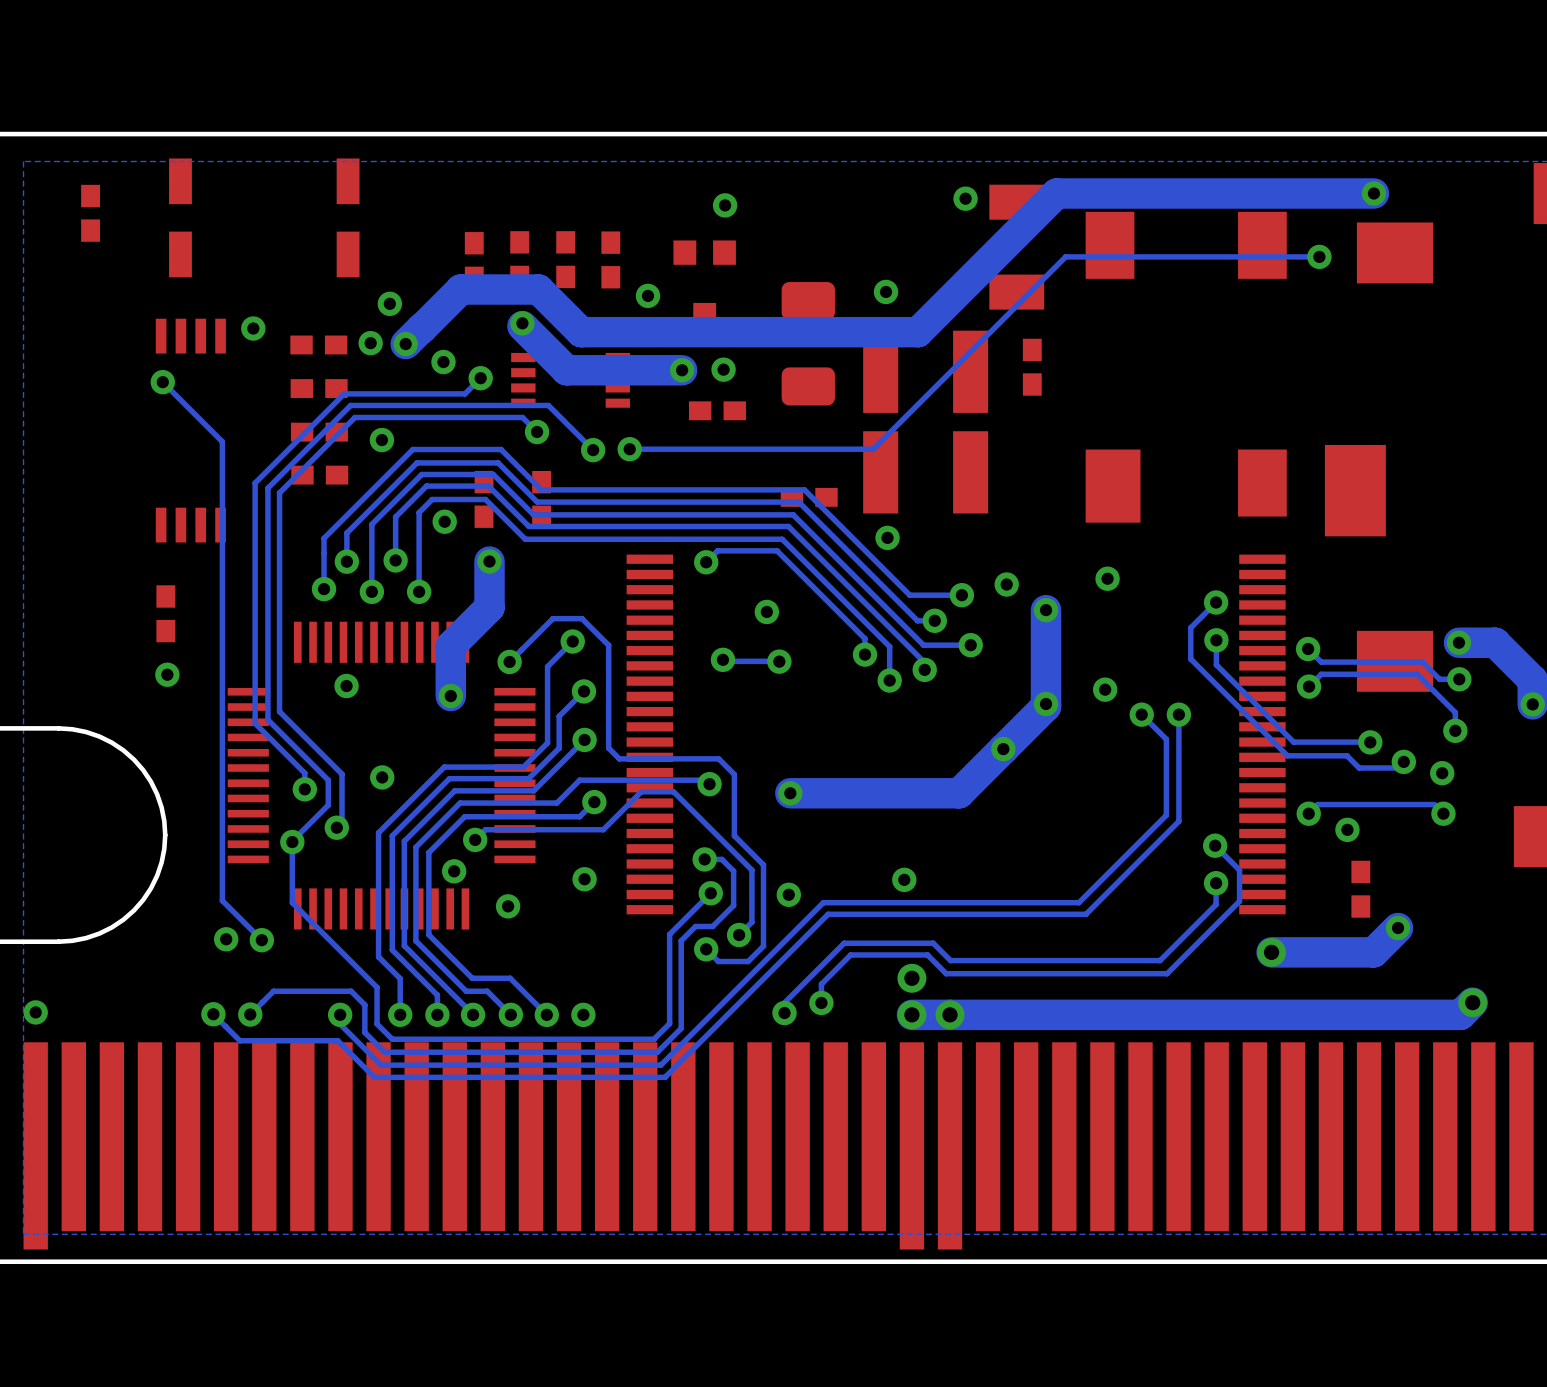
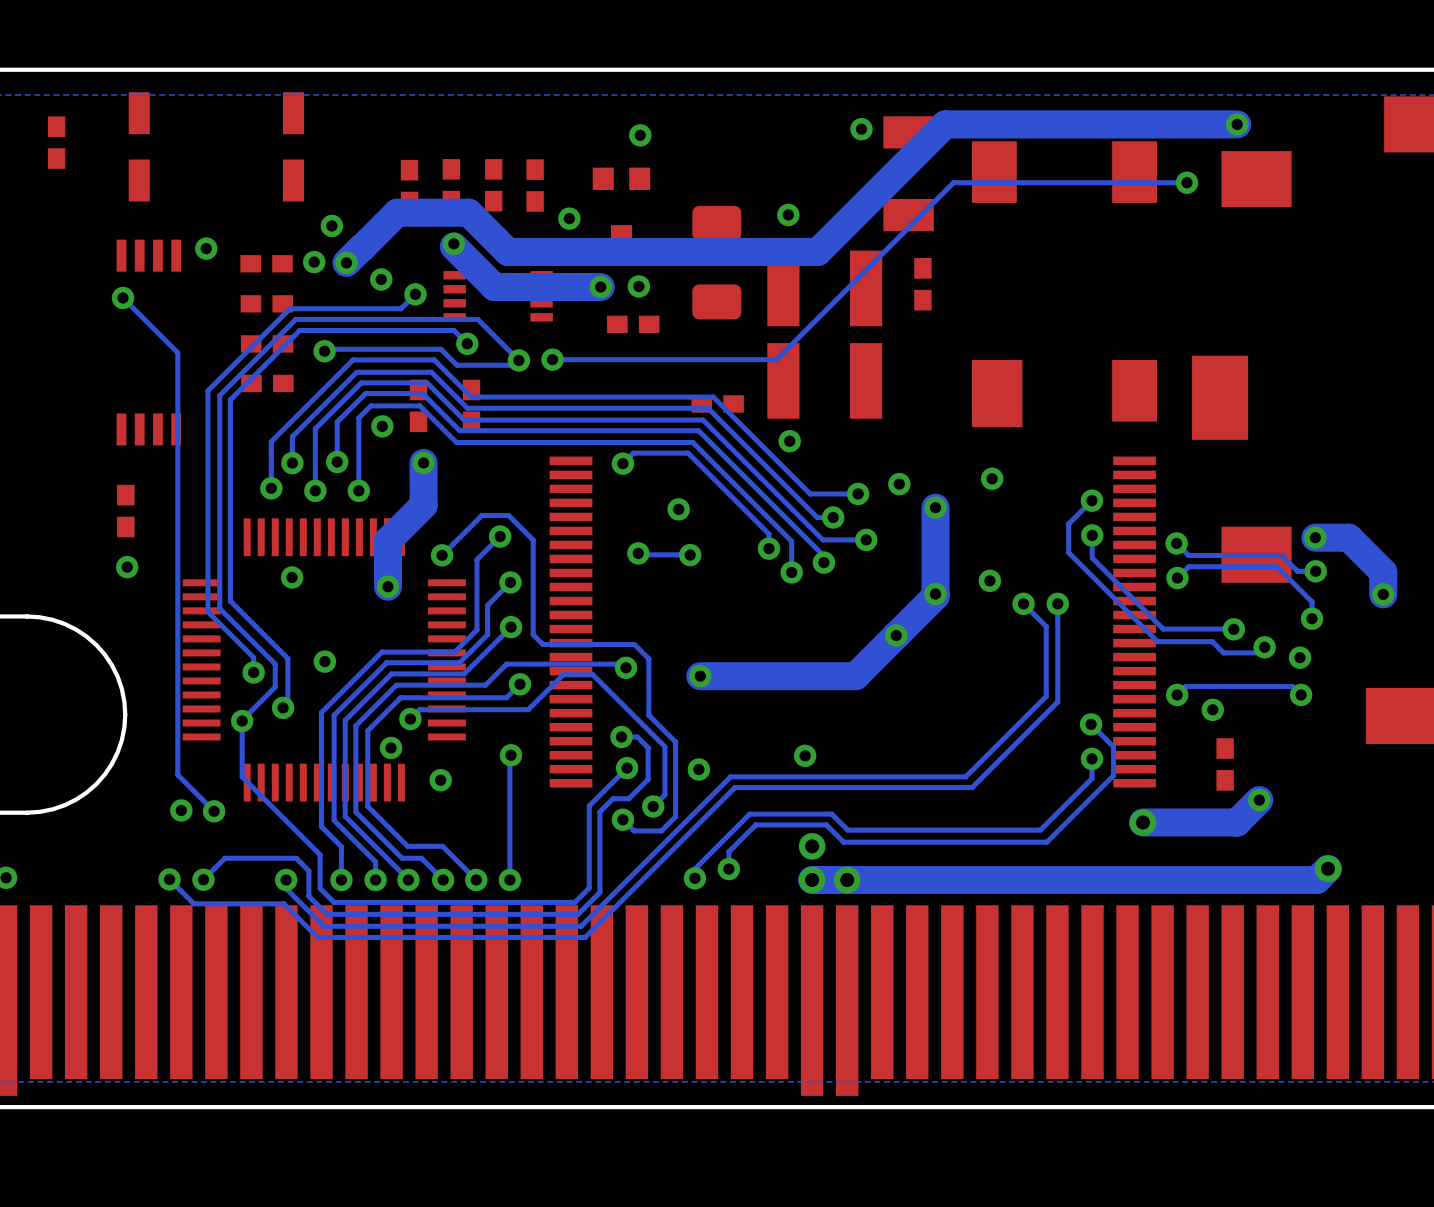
bottom track: none -> (324, 353) (328, 349) (441, 349) (457, 365) (514, 365) (518, 360)
bottom track: none -> (509, 755) (509, 880)

